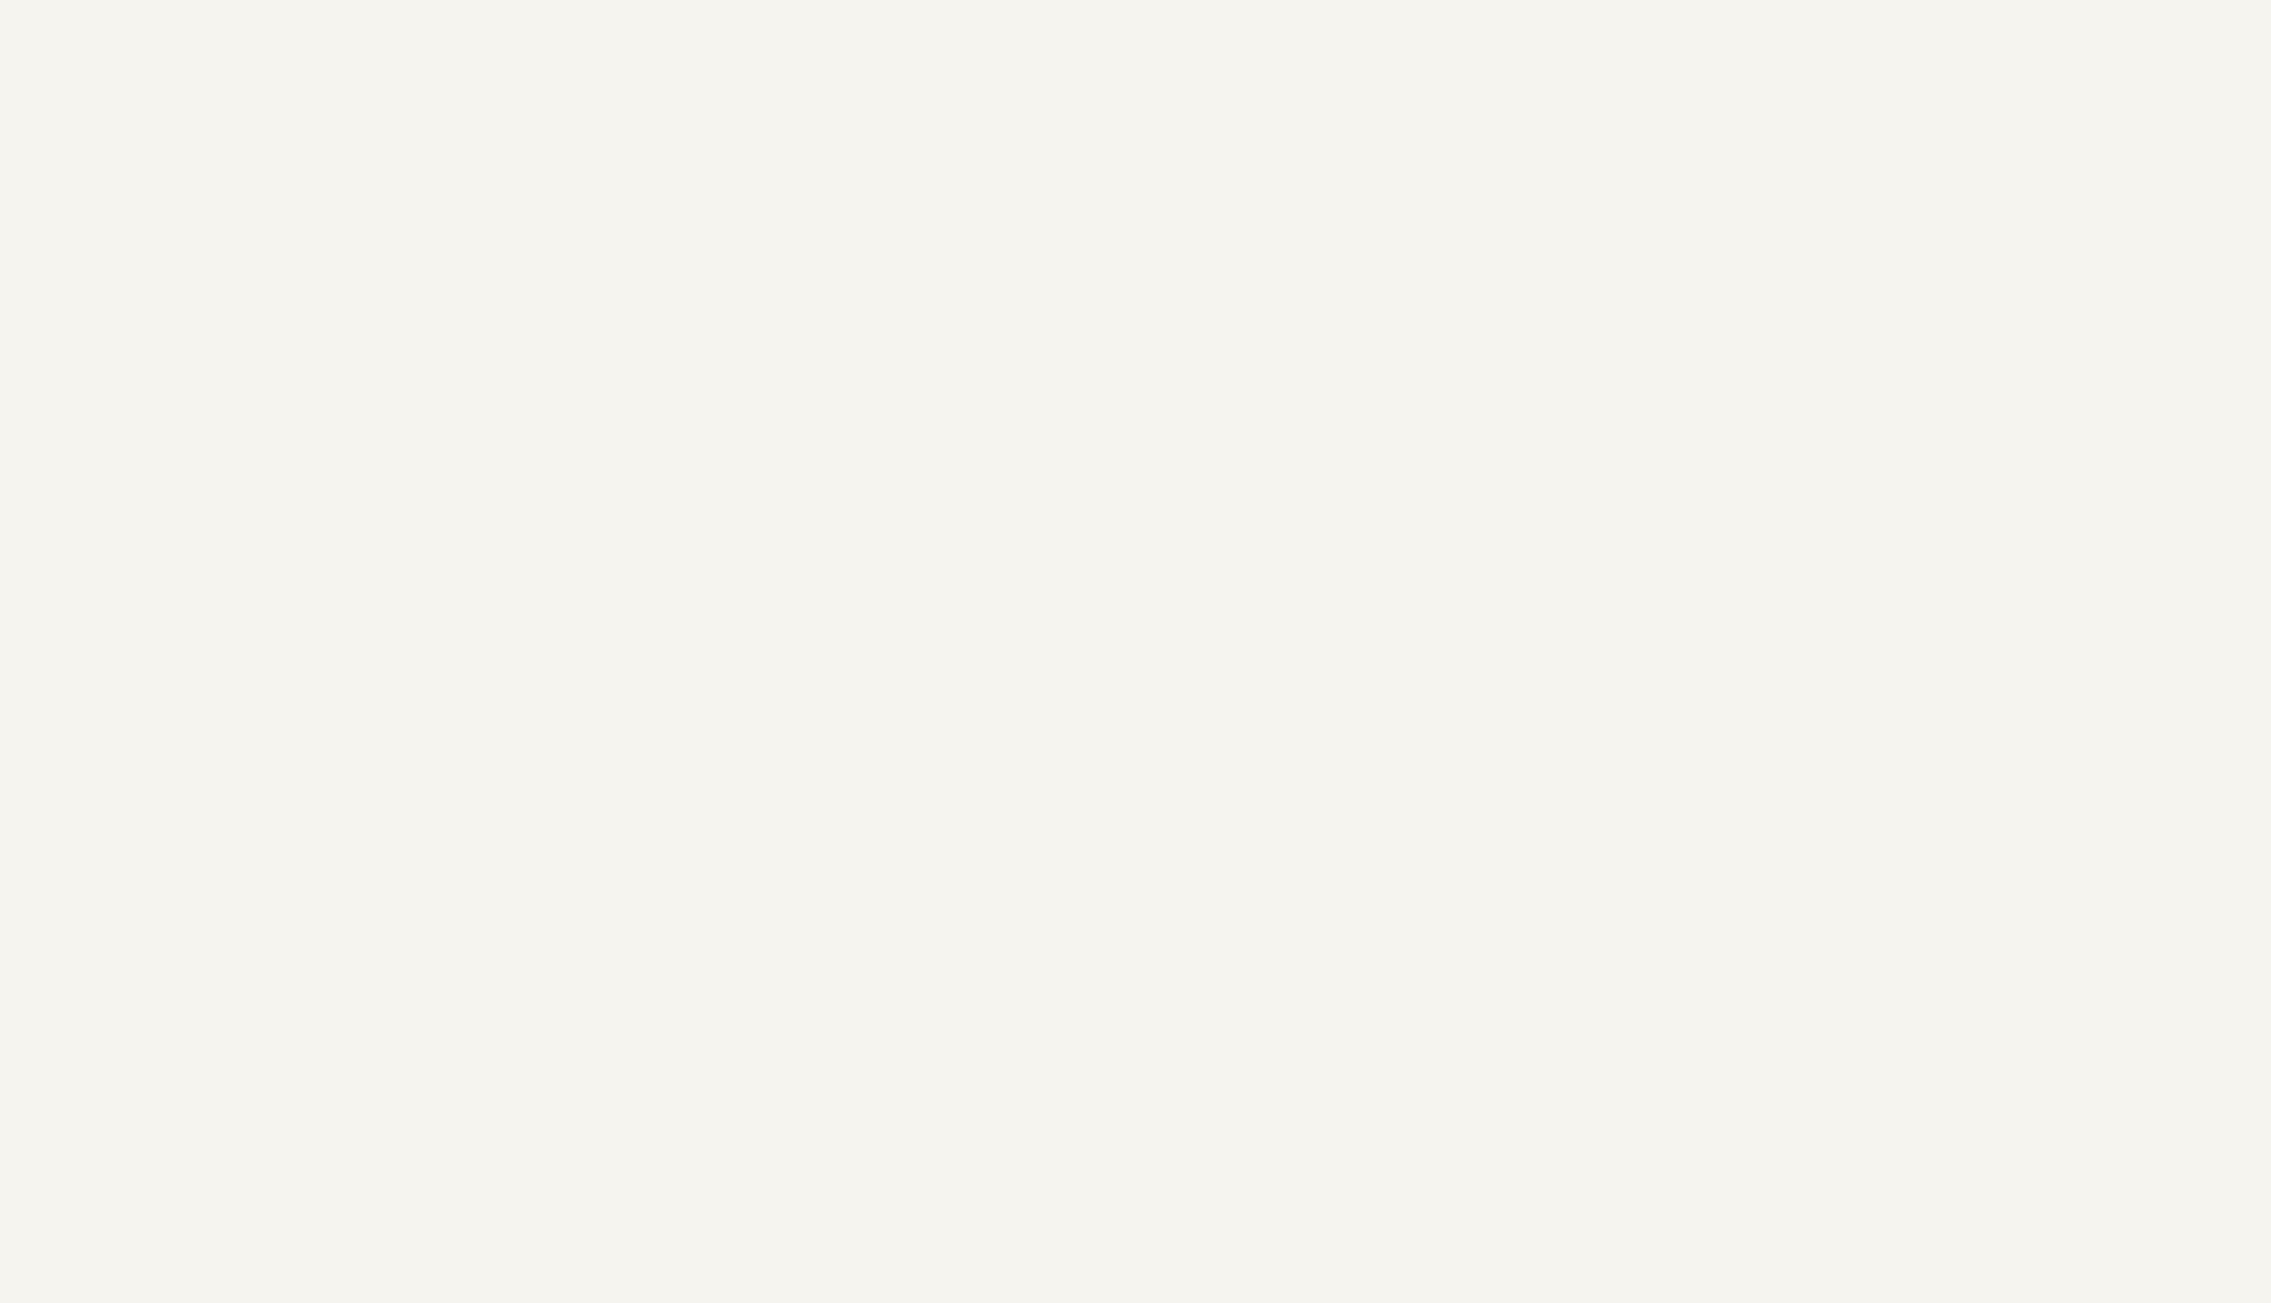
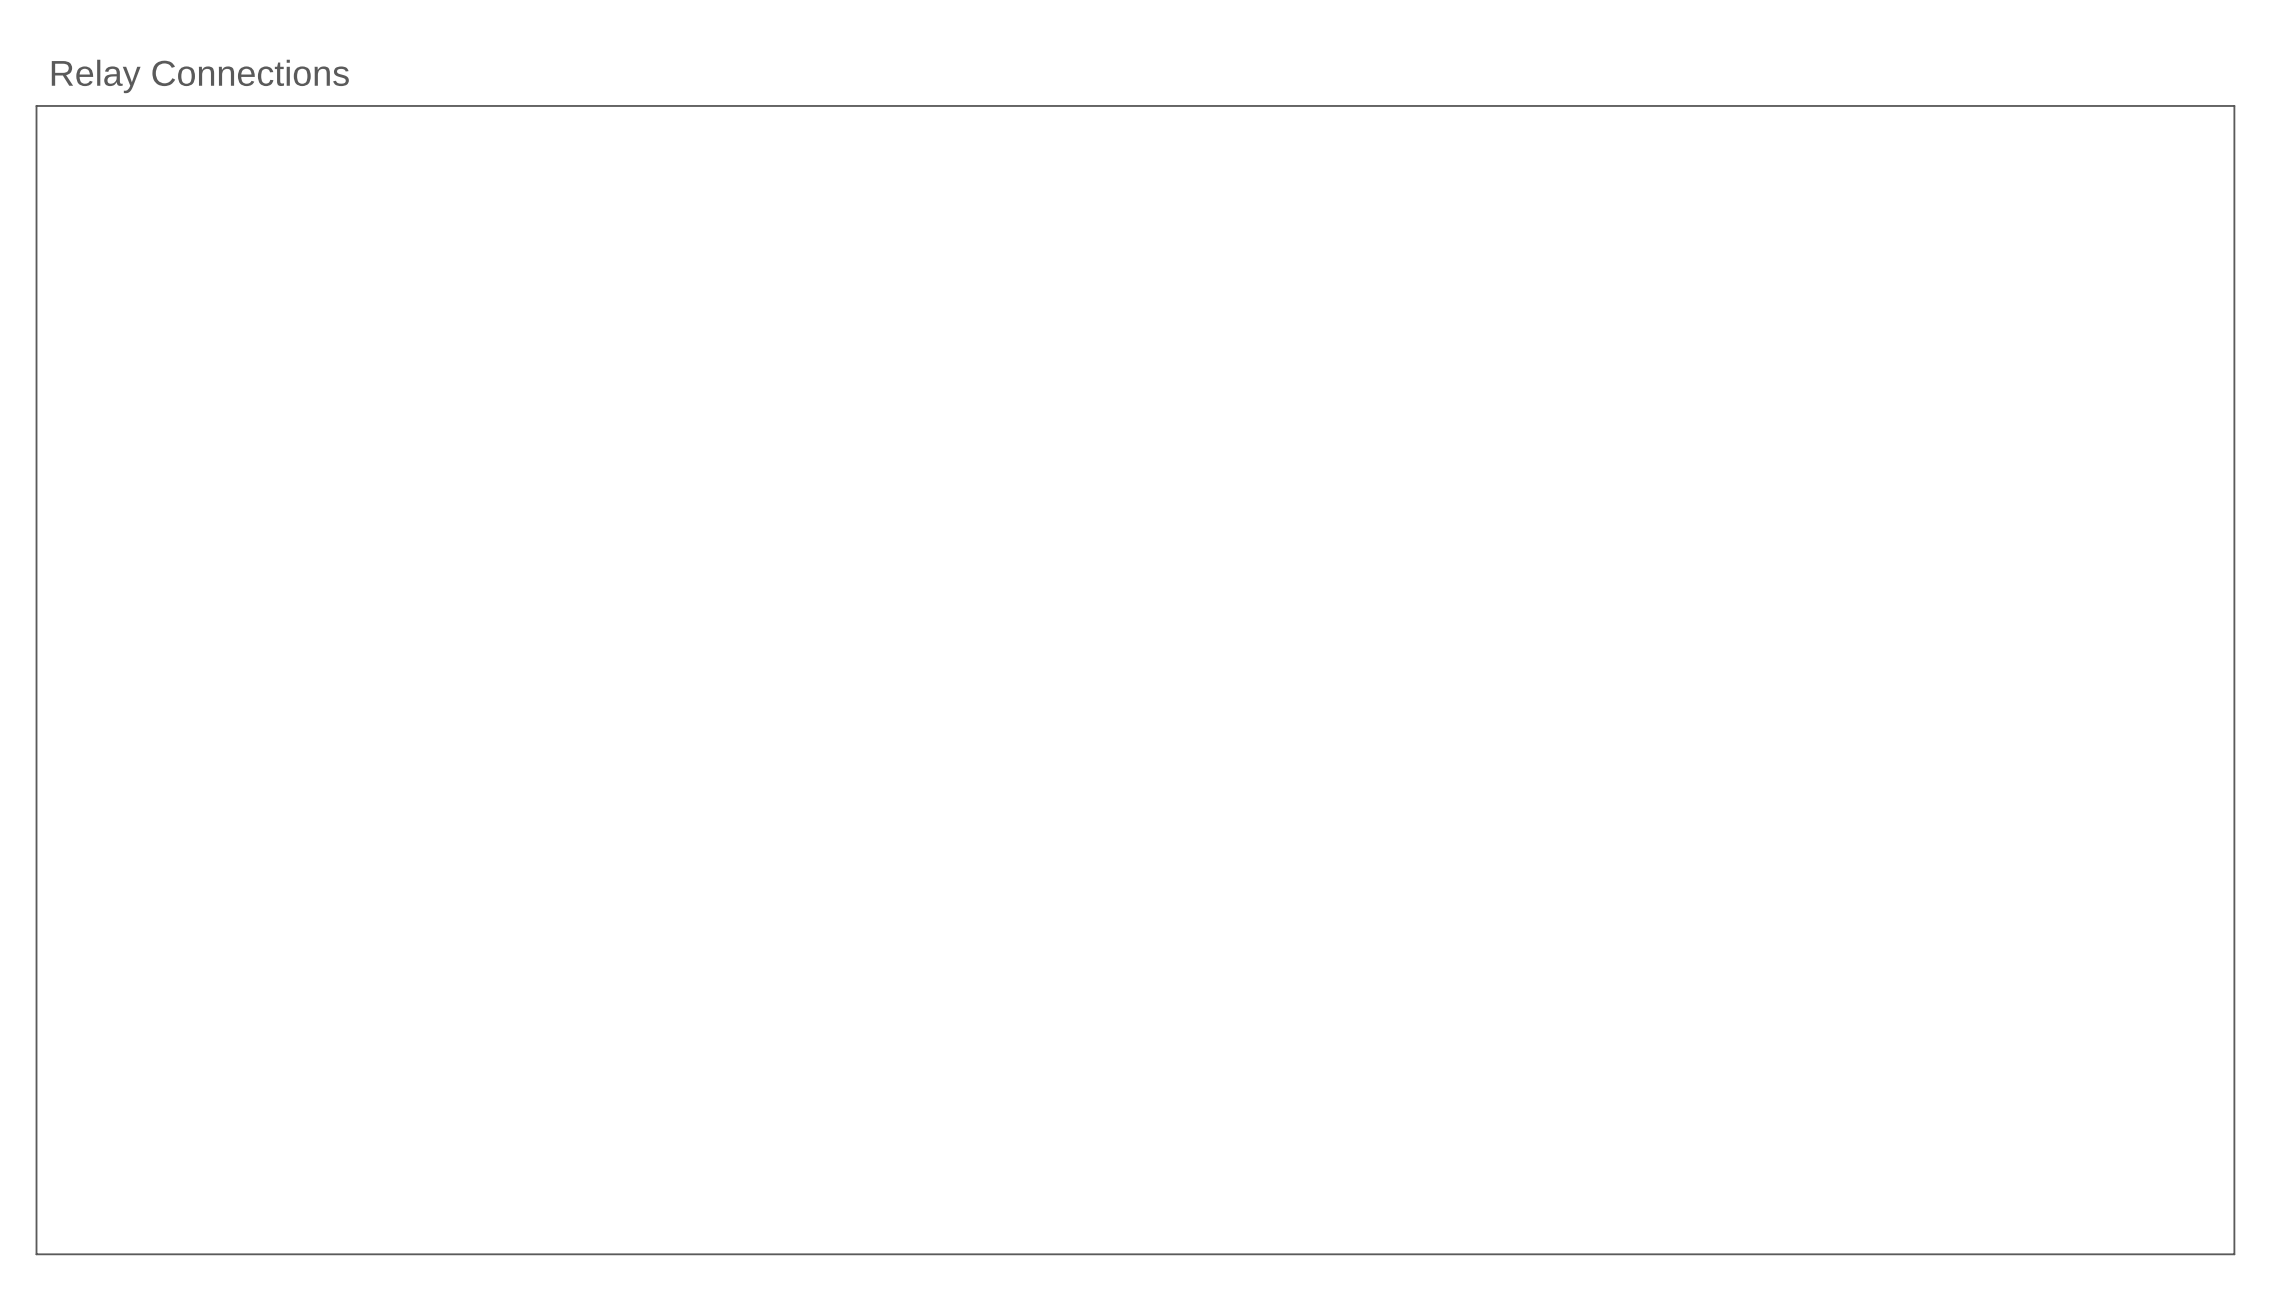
text: none -> Relay Connections (200, 76)
line: none -> (36, 105) (36, 1254) (2234, 1254) (2234, 105) (36, 105)

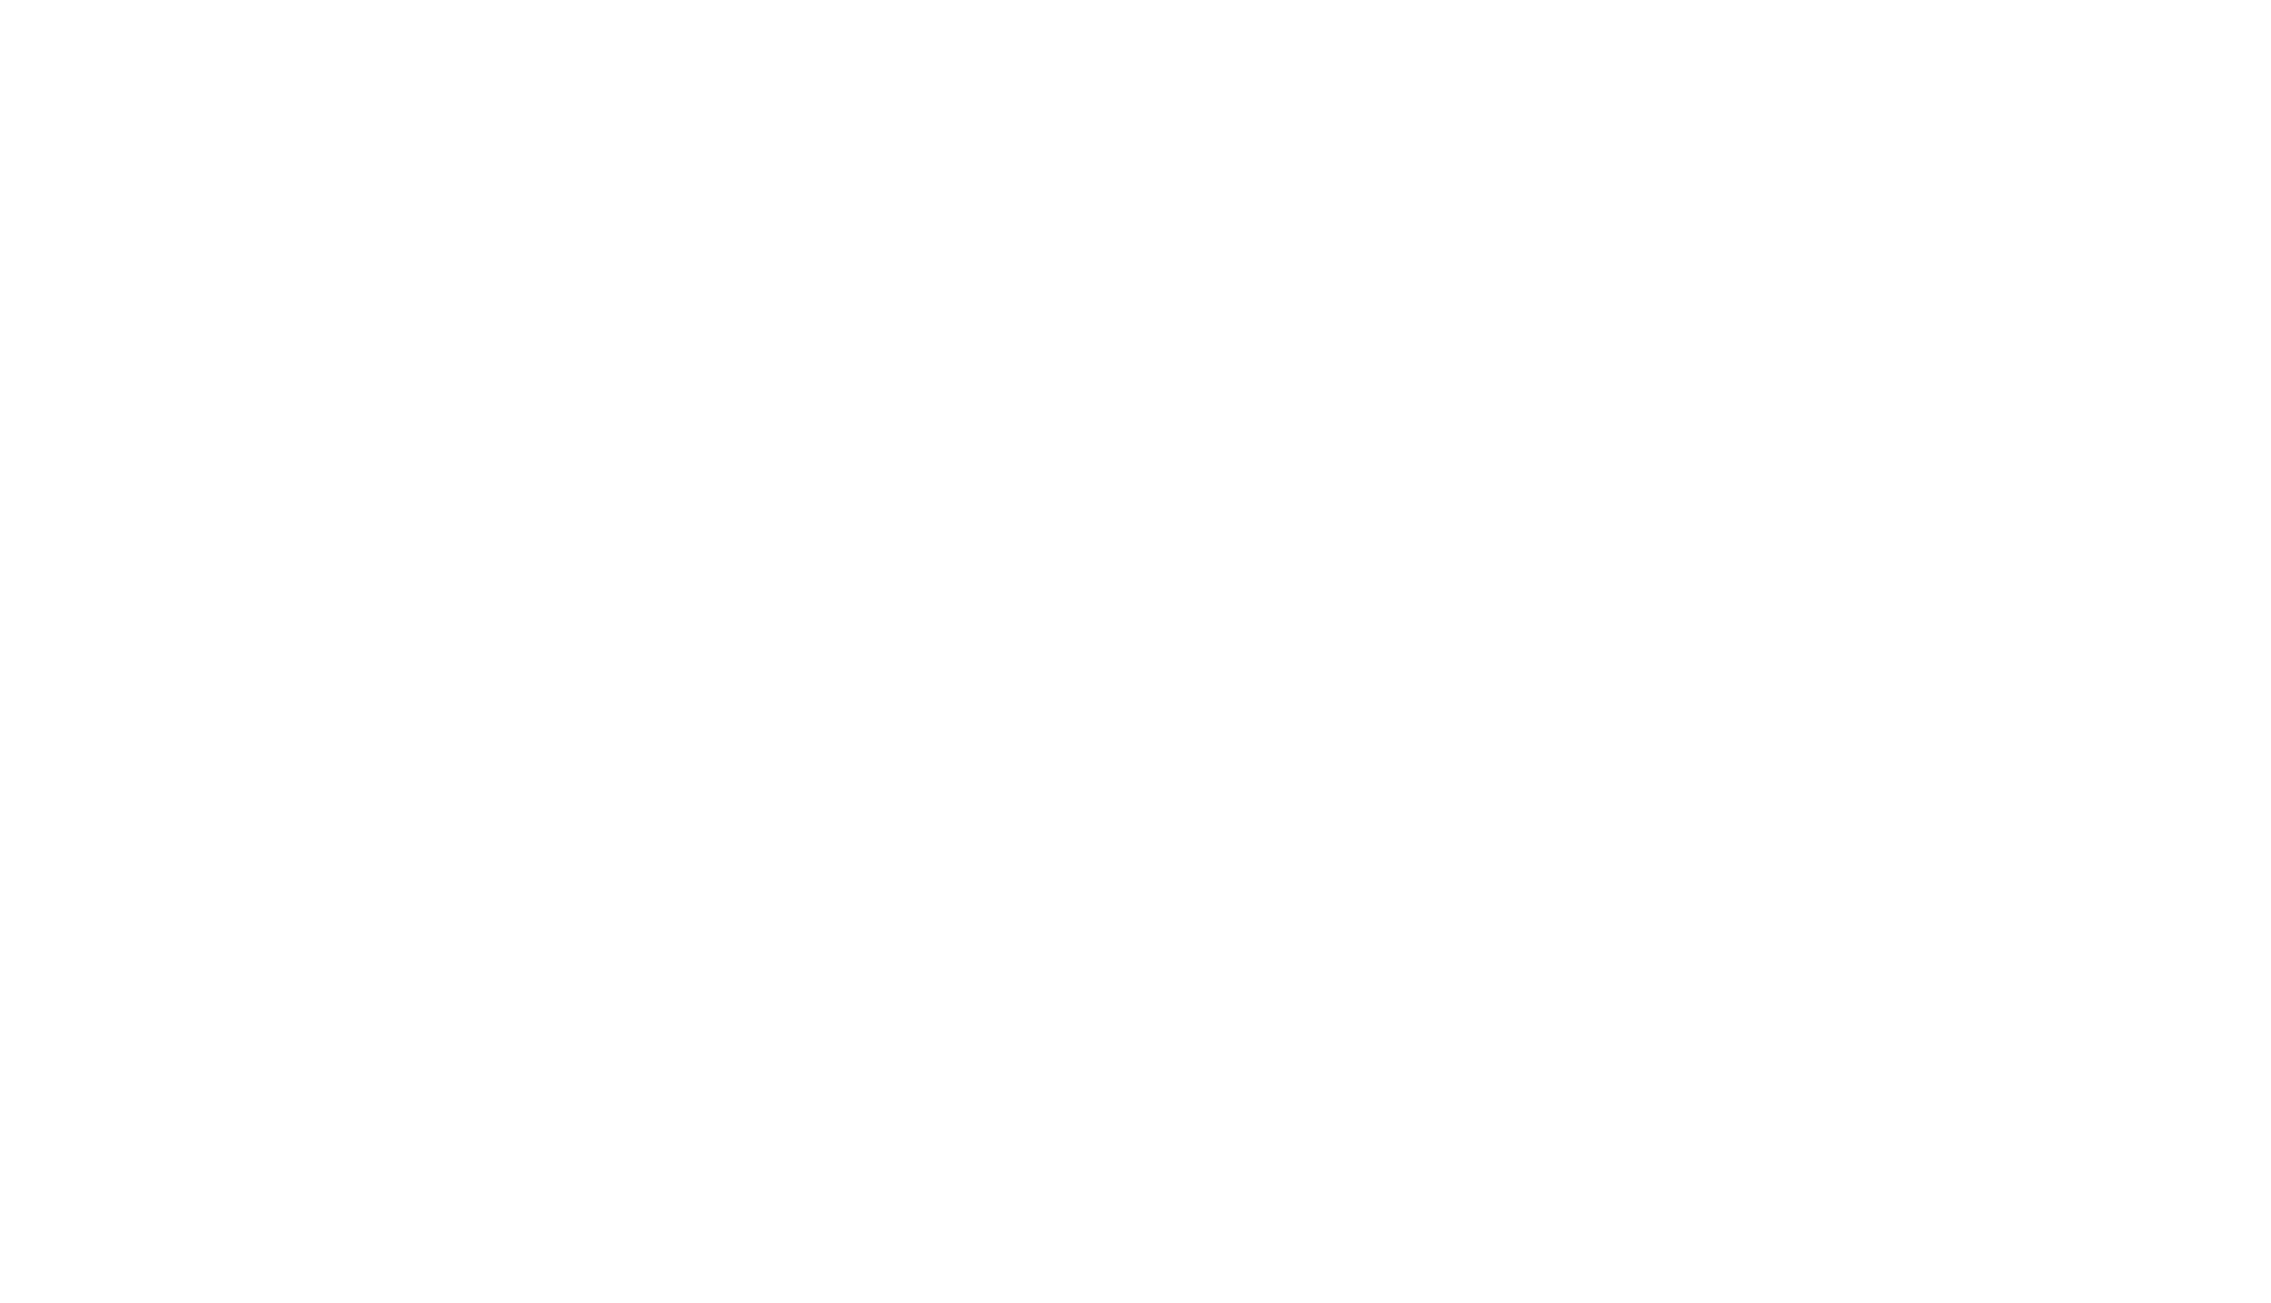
text: Relay Connections (200, 76) -> none
line: (36, 105) (36, 1254) (2234, 1254) (2234, 105) (36, 105) -> none

